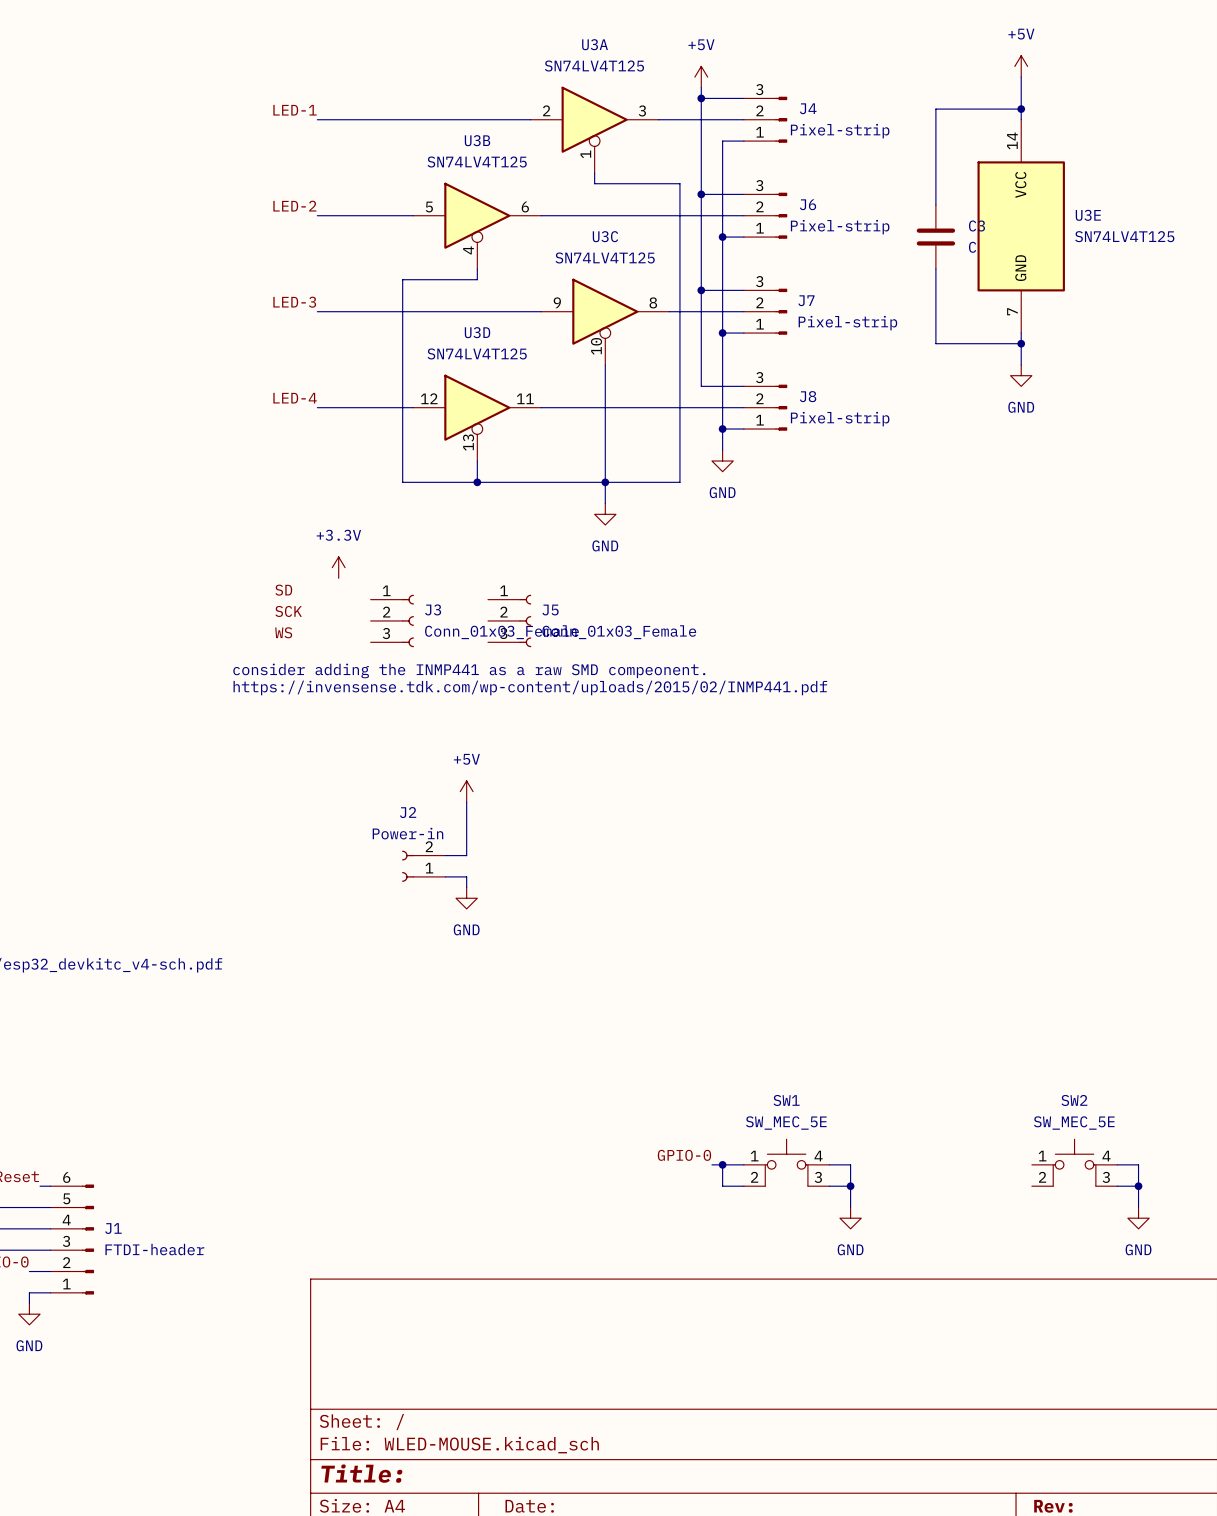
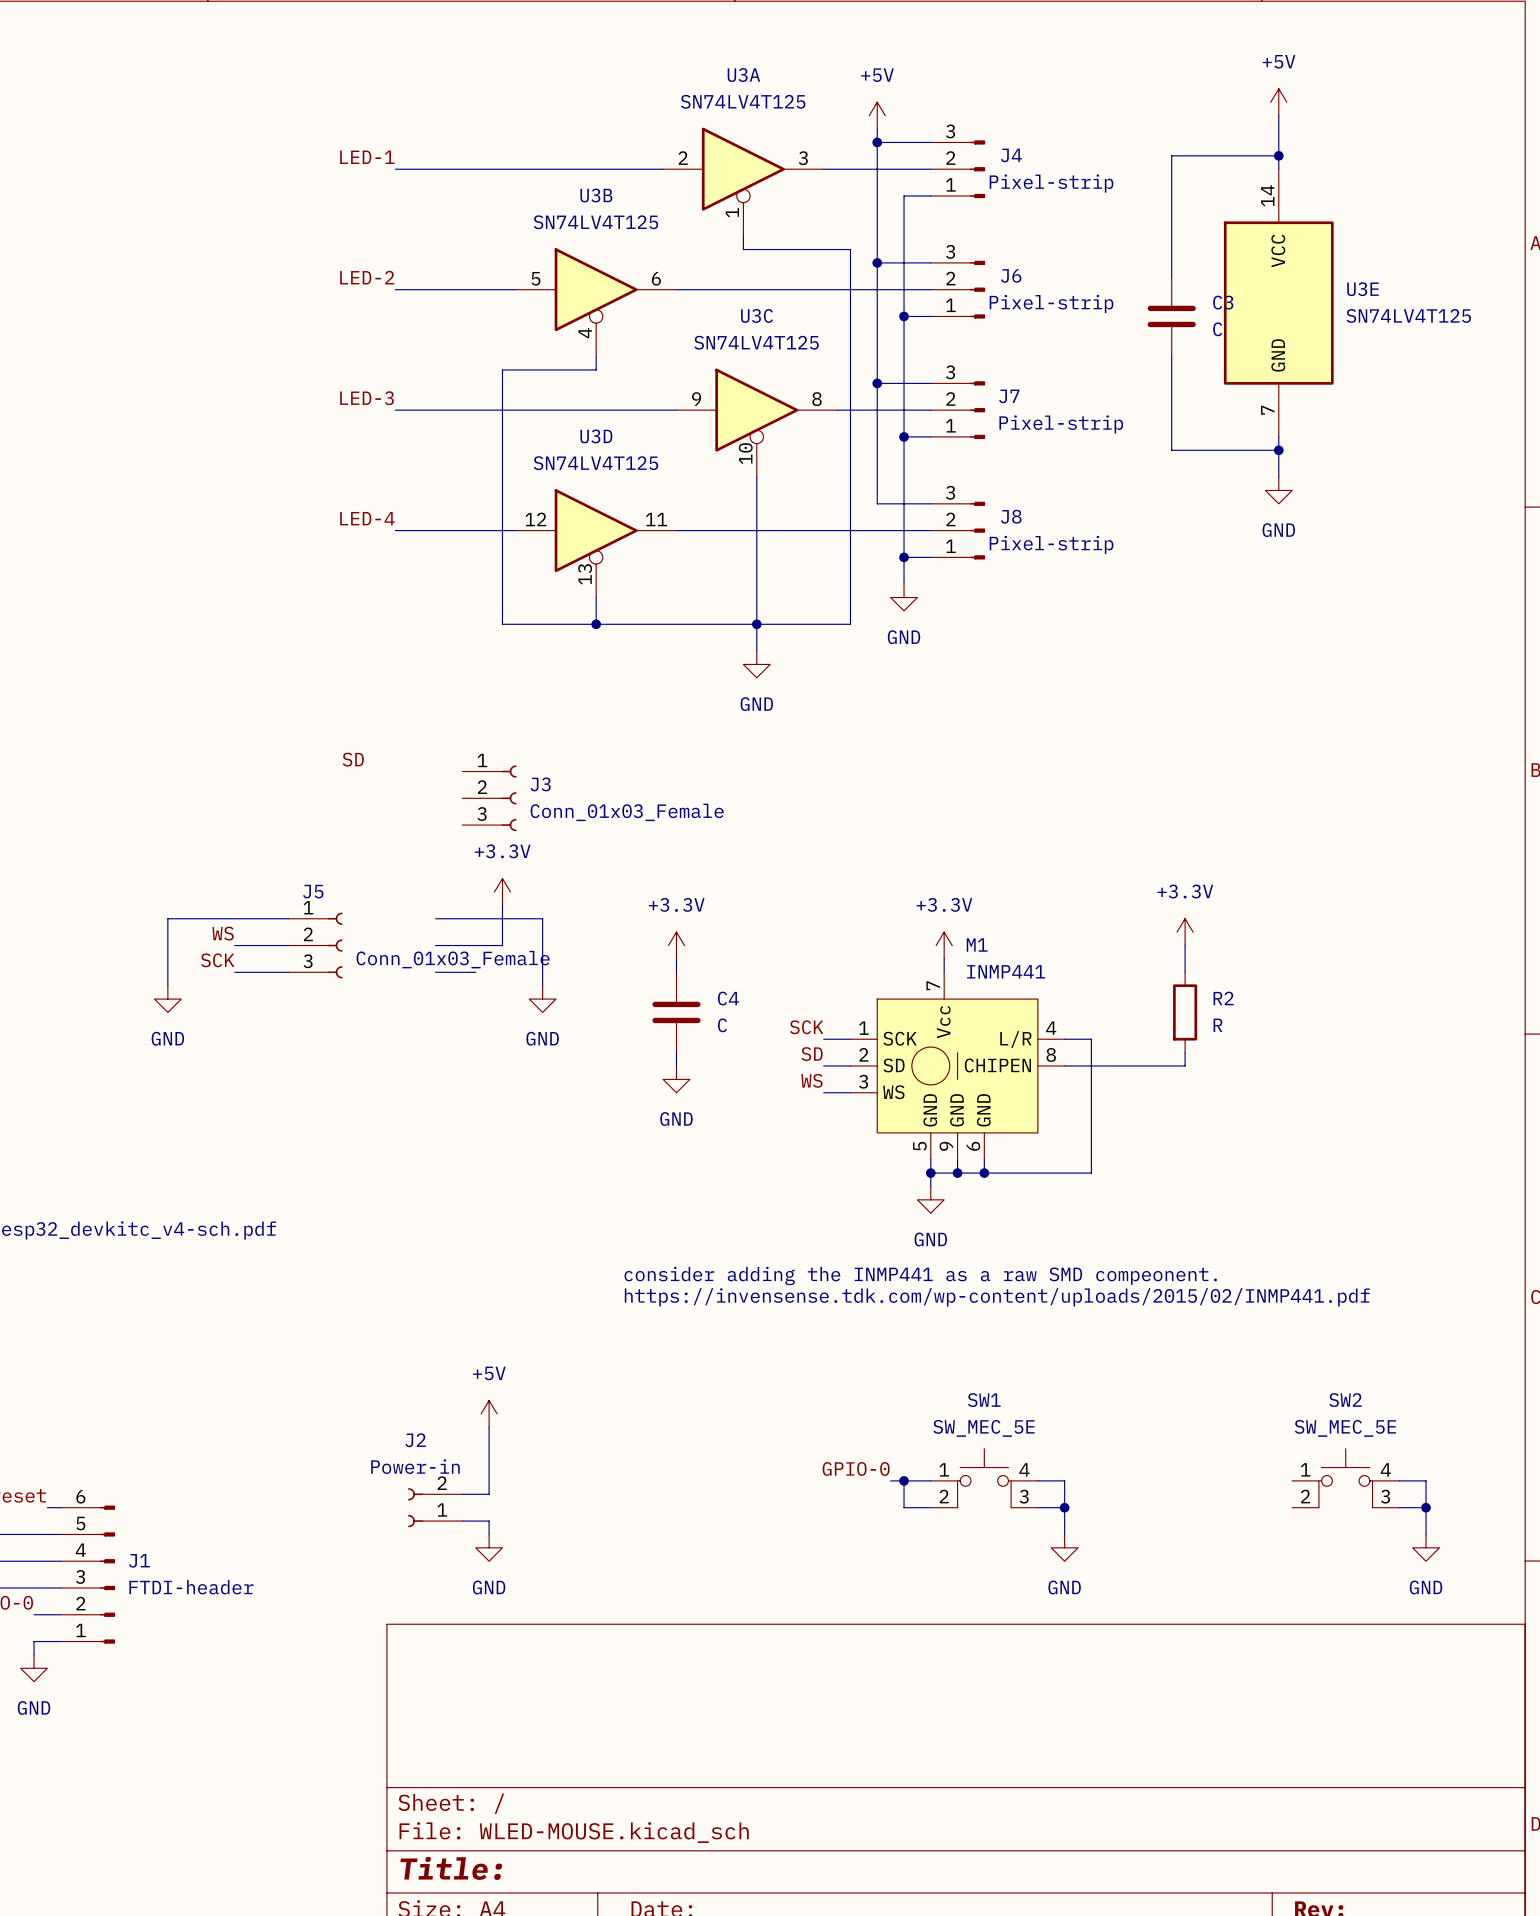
power symbol: +3.3V (338, 567) -> none
J5 name position: J5 (550, 610) -> J5 (313, 891)
label position: SCK (288, 611) -> SCK (217, 960)
J5 position: (509, 620) -> (315, 945)
label position: WS (283, 632) -> WS (223, 933)
text: consider adding the INMP441 as a raw SMD compeonent. (469, 670) -> none
text: https://invensense.tdk.com/wp-content/uploads/2015/02/INMP441.pdf (530, 687) -> none
power symbol: none -> +3.3V (502, 891)
wire: none -> (502, 905) (502, 945) (435, 945)
wire: none -> (288, 918) (167, 918) (167, 985)
wire: none -> (435, 918) (542, 918) (542, 985)
power symbol: none -> +3.3V (1185, 932)
wire: none -> (234, 945) (288, 945)
power symbol: none -> +3.3V (676, 945)
power symbol: none -> +3.3V (944, 945)
wire: none -> (1185, 945) (1185, 972)
wire: none -> (676, 958) (676, 972)
wire: none -> (944, 958) (944, 972)
wire: none -> (234, 972) (288, 972)
wire: none -> (435, 972) (475, 972)
power symbol: none -> GND (167, 999)
power symbol: none -> GND (542, 999)
power symbol: +5V (466, 791) -> none
C4: none -> C (676, 1012)
R2: none -> R (1185, 1012)
wire: (466, 802) (466, 855) (445, 855) -> none
label: none -> SCK (806, 1027)
wire: none -> (823, 1039) (850, 1039)
wire: none -> (1064, 1039) (1091, 1039) (1091, 1173) (930, 1173)
wire: none -> (676, 1052) (676, 1065)
wire: none -> (1185, 1052) (1185, 1065) (1064, 1065)
label: none -> SD (812, 1054)
wire: none -> (823, 1065) (850, 1065)
M1: none -> INMP441 (957, 1065)
power symbol: none -> GND (676, 1079)
label: none -> WS (811, 1080)
wire: none -> (823, 1092) (850, 1092)
J2 position: (423, 866) -> (435, 1507)
wire: (445, 876) (466, 876) (466, 887) -> none
power symbol: GND (466, 898) -> none
wire: none -> (930, 1159) (930, 1186)
wire: none -> (957, 1159) (957, 1173)
wire: none -> (984, 1159) (984, 1173)
junction: none -> (930, 1173)
junction: none -> (957, 1173)
junction: none -> (984, 1173)
power symbol: none -> GND (930, 1199)
text: none -> consider adding the INMP441 as a raw SMD compeonent. (920, 1275)
text: none -> https://invensense.tdk.com/wp-content/uploads/2015/02/INMP441.pdf (997, 1297)
power symbol: none -> +5V (489, 1413)
wire: none -> (489, 1427) (489, 1494) (462, 1494)
wire: none -> (462, 1521) (489, 1521) (489, 1534)
power symbol: none -> GND (489, 1547)

